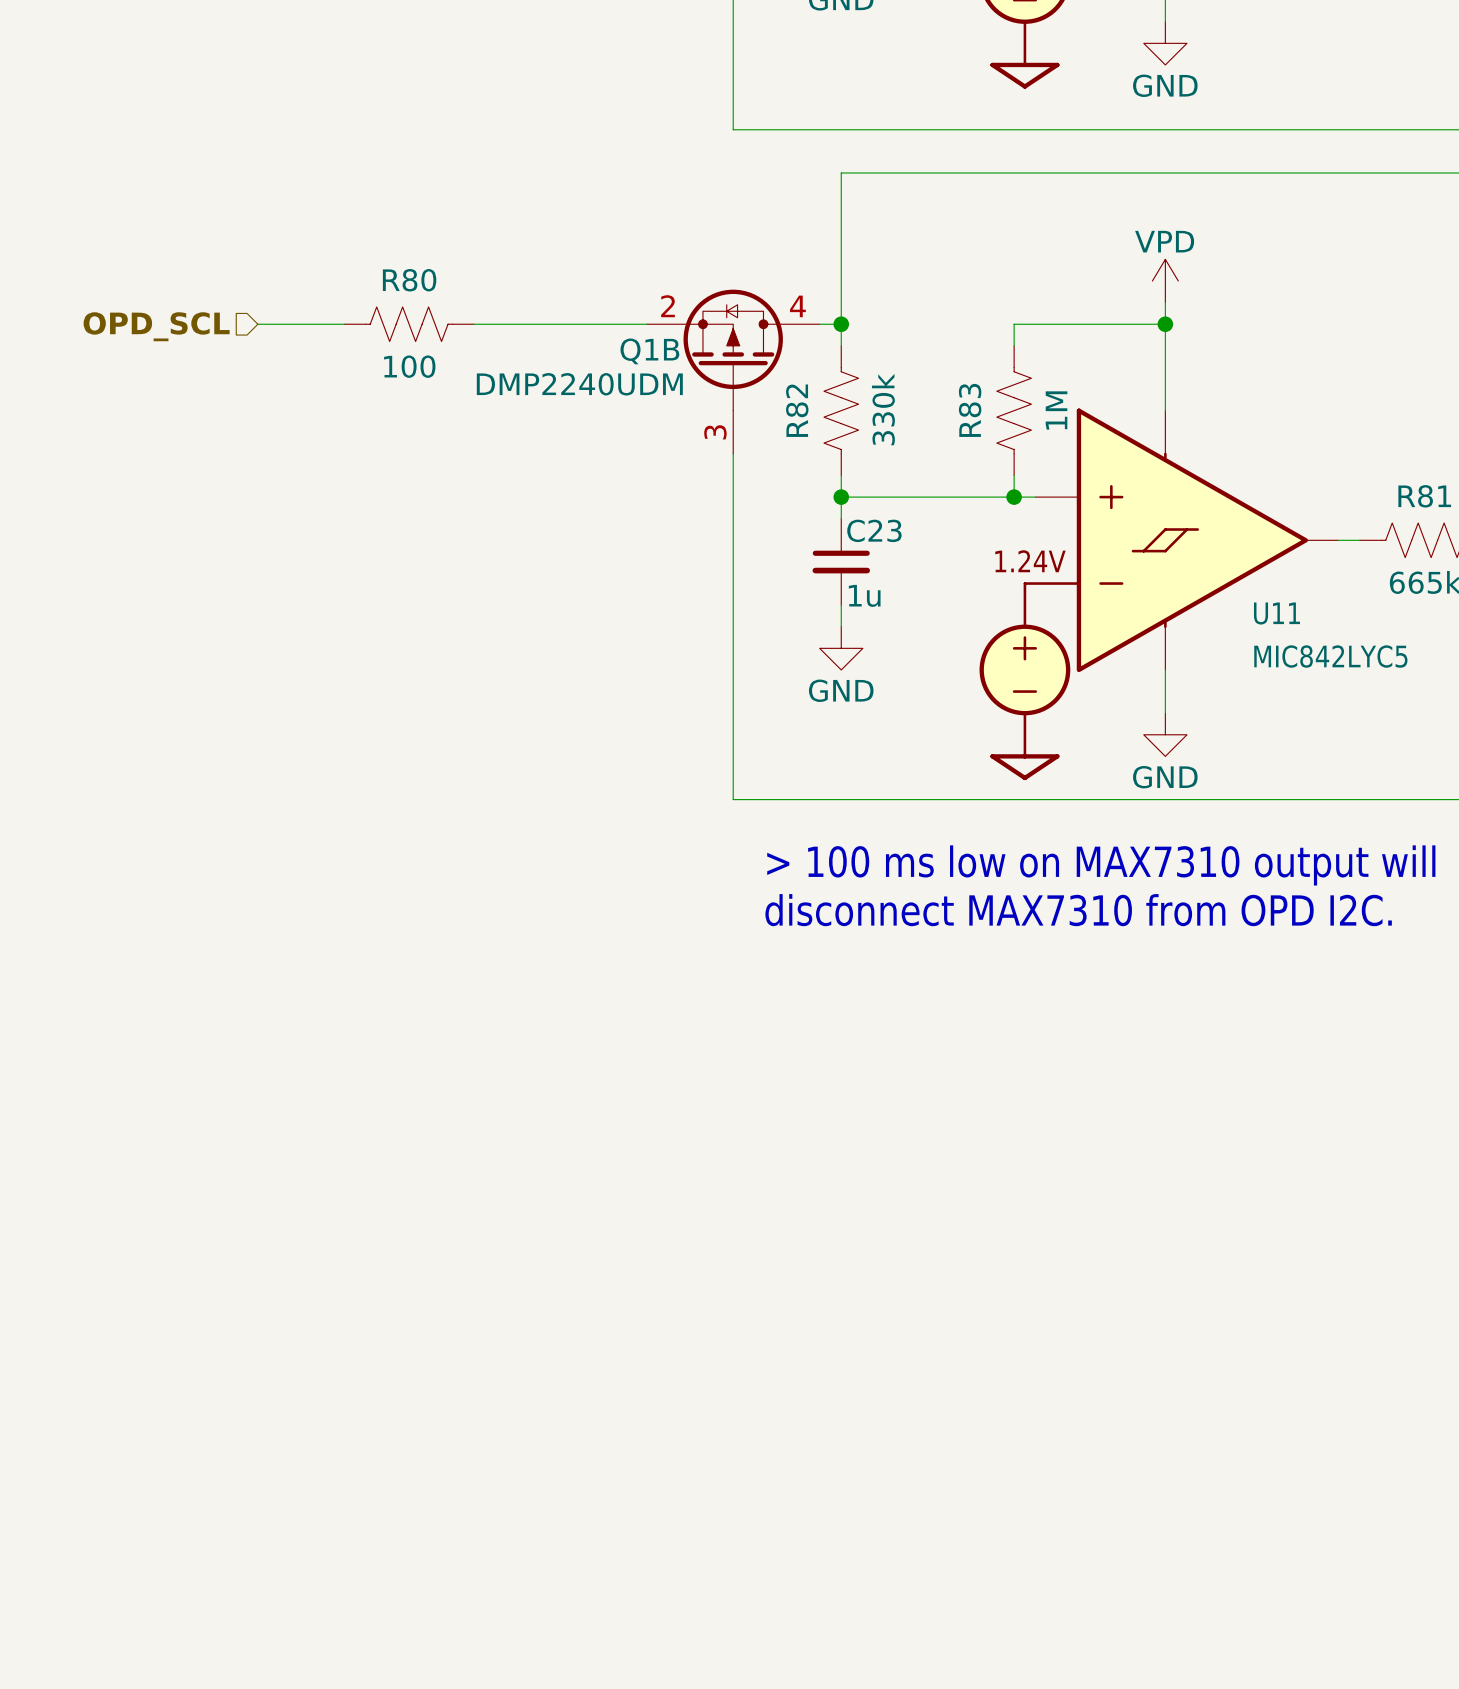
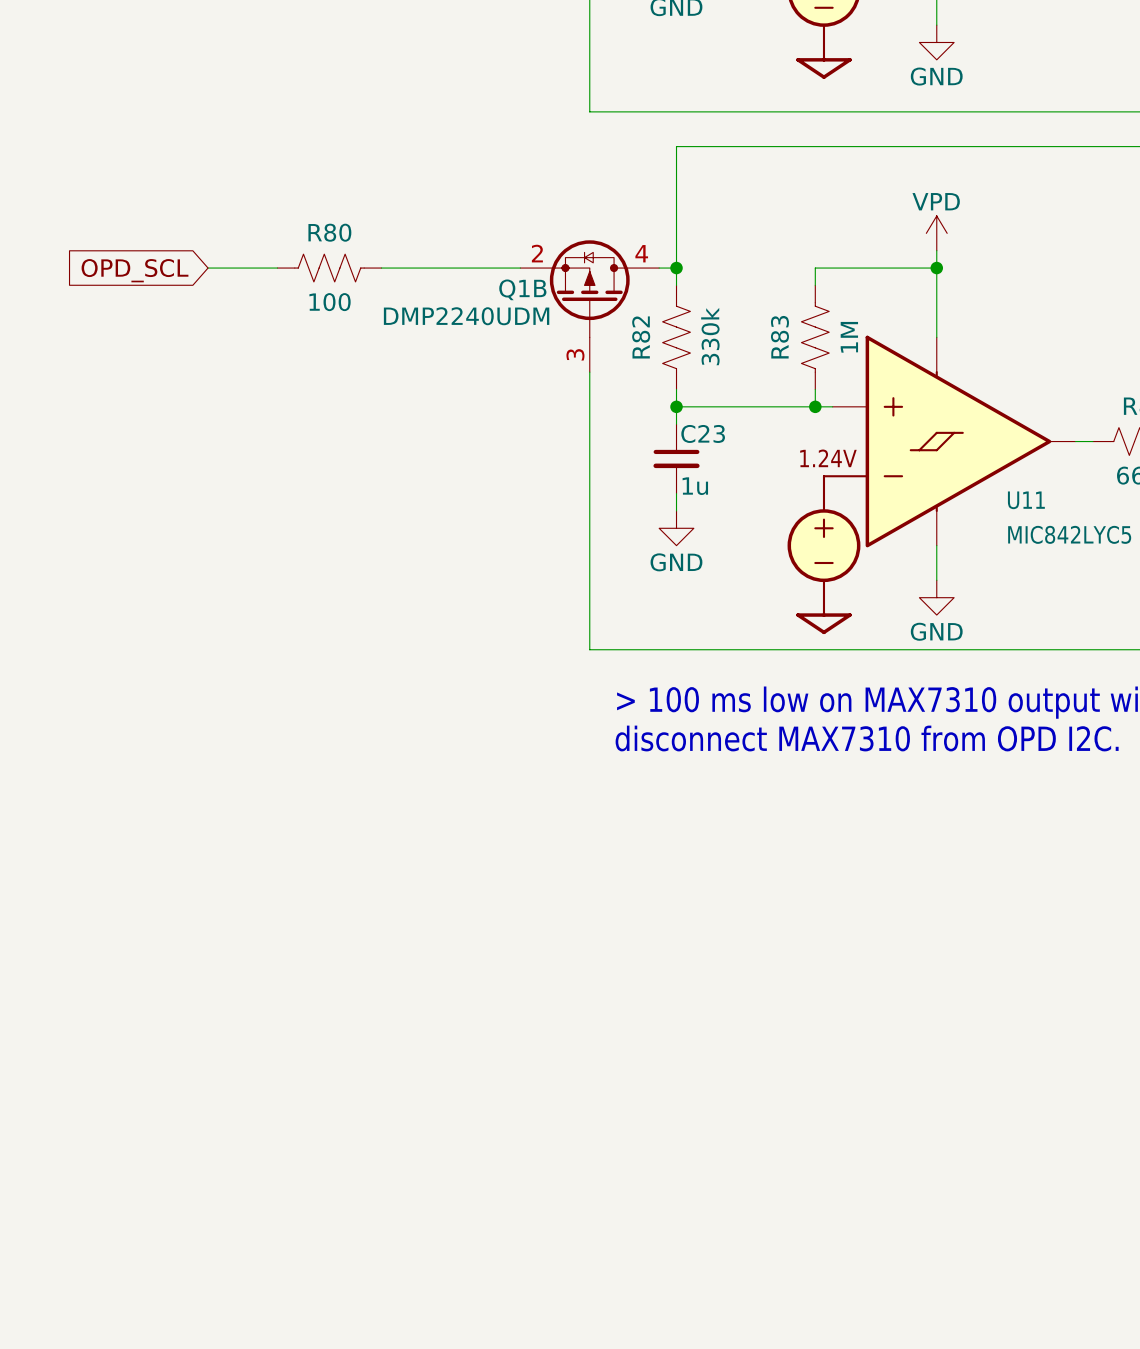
hierarchical label: OPD_SCL (156, 326) -> none
global label: none -> OPD_SCL (134, 270)

